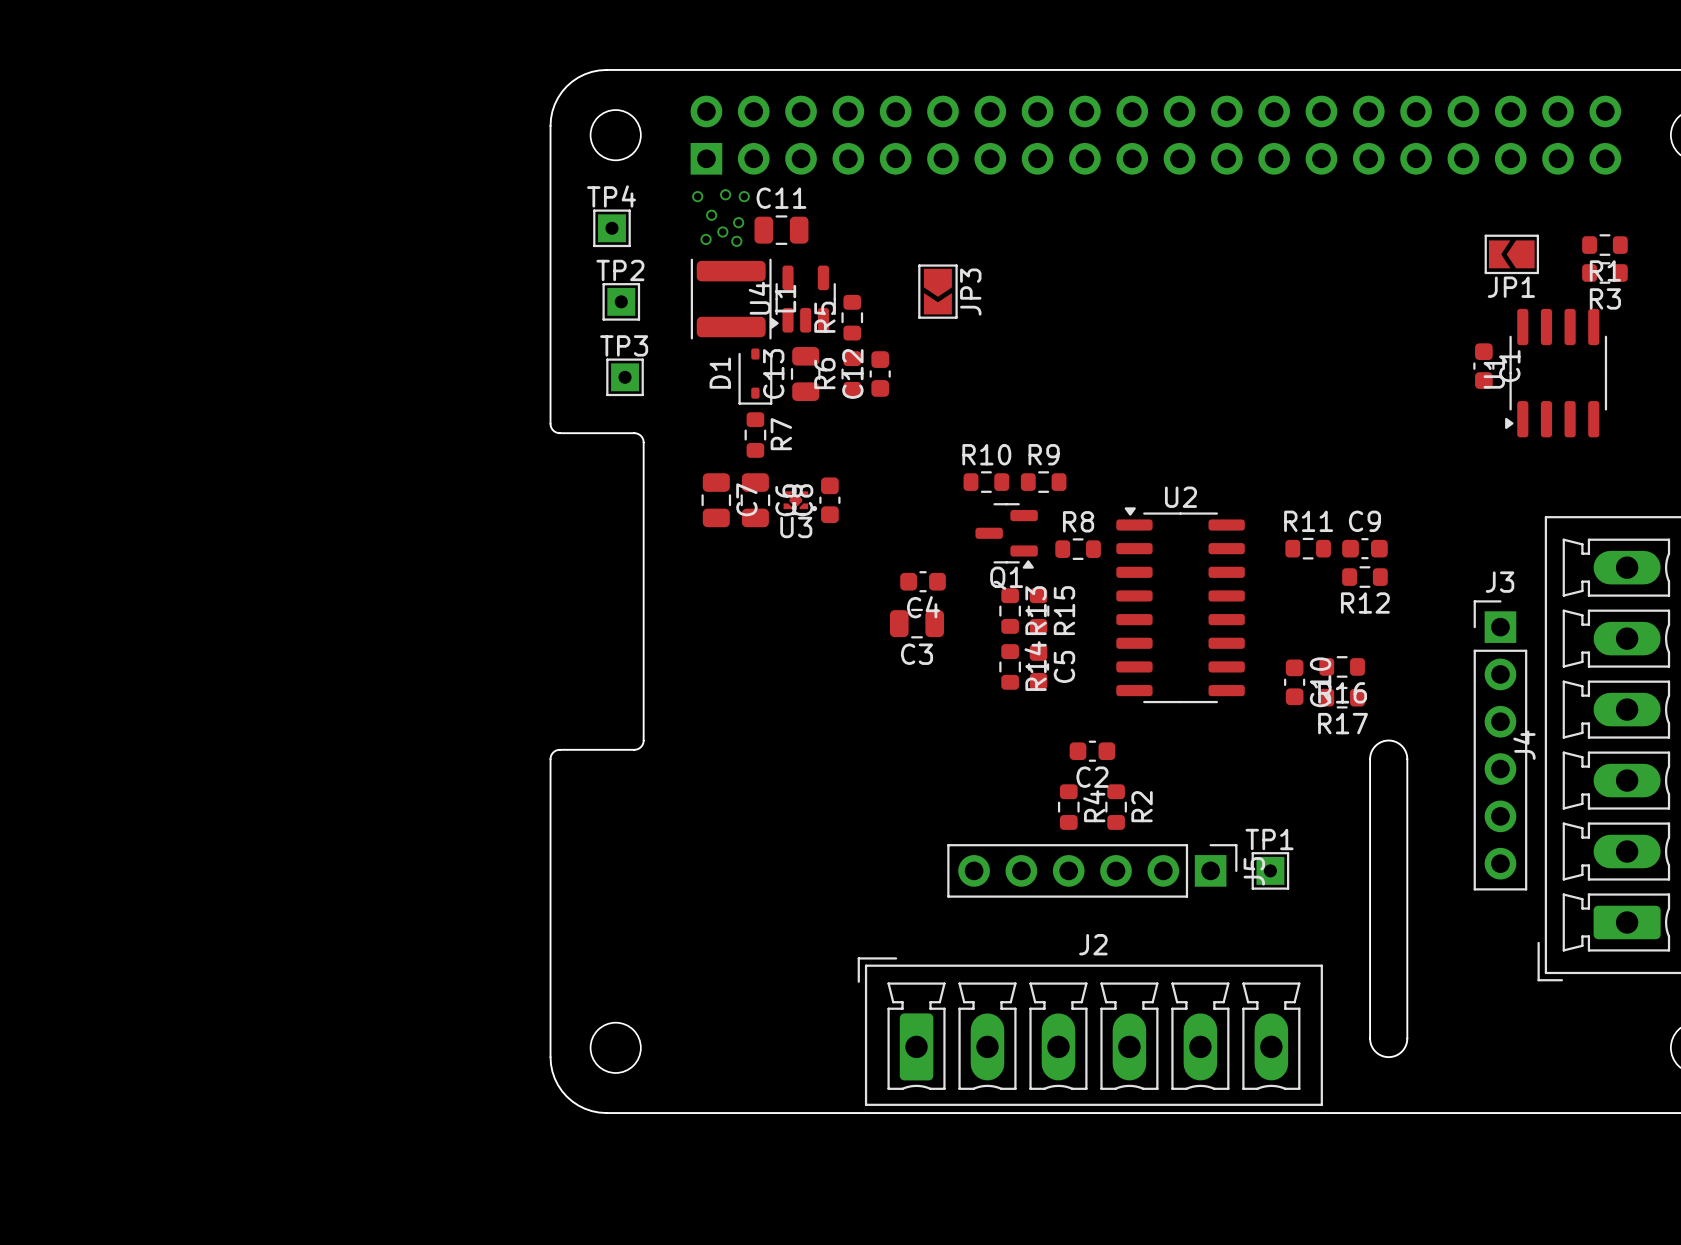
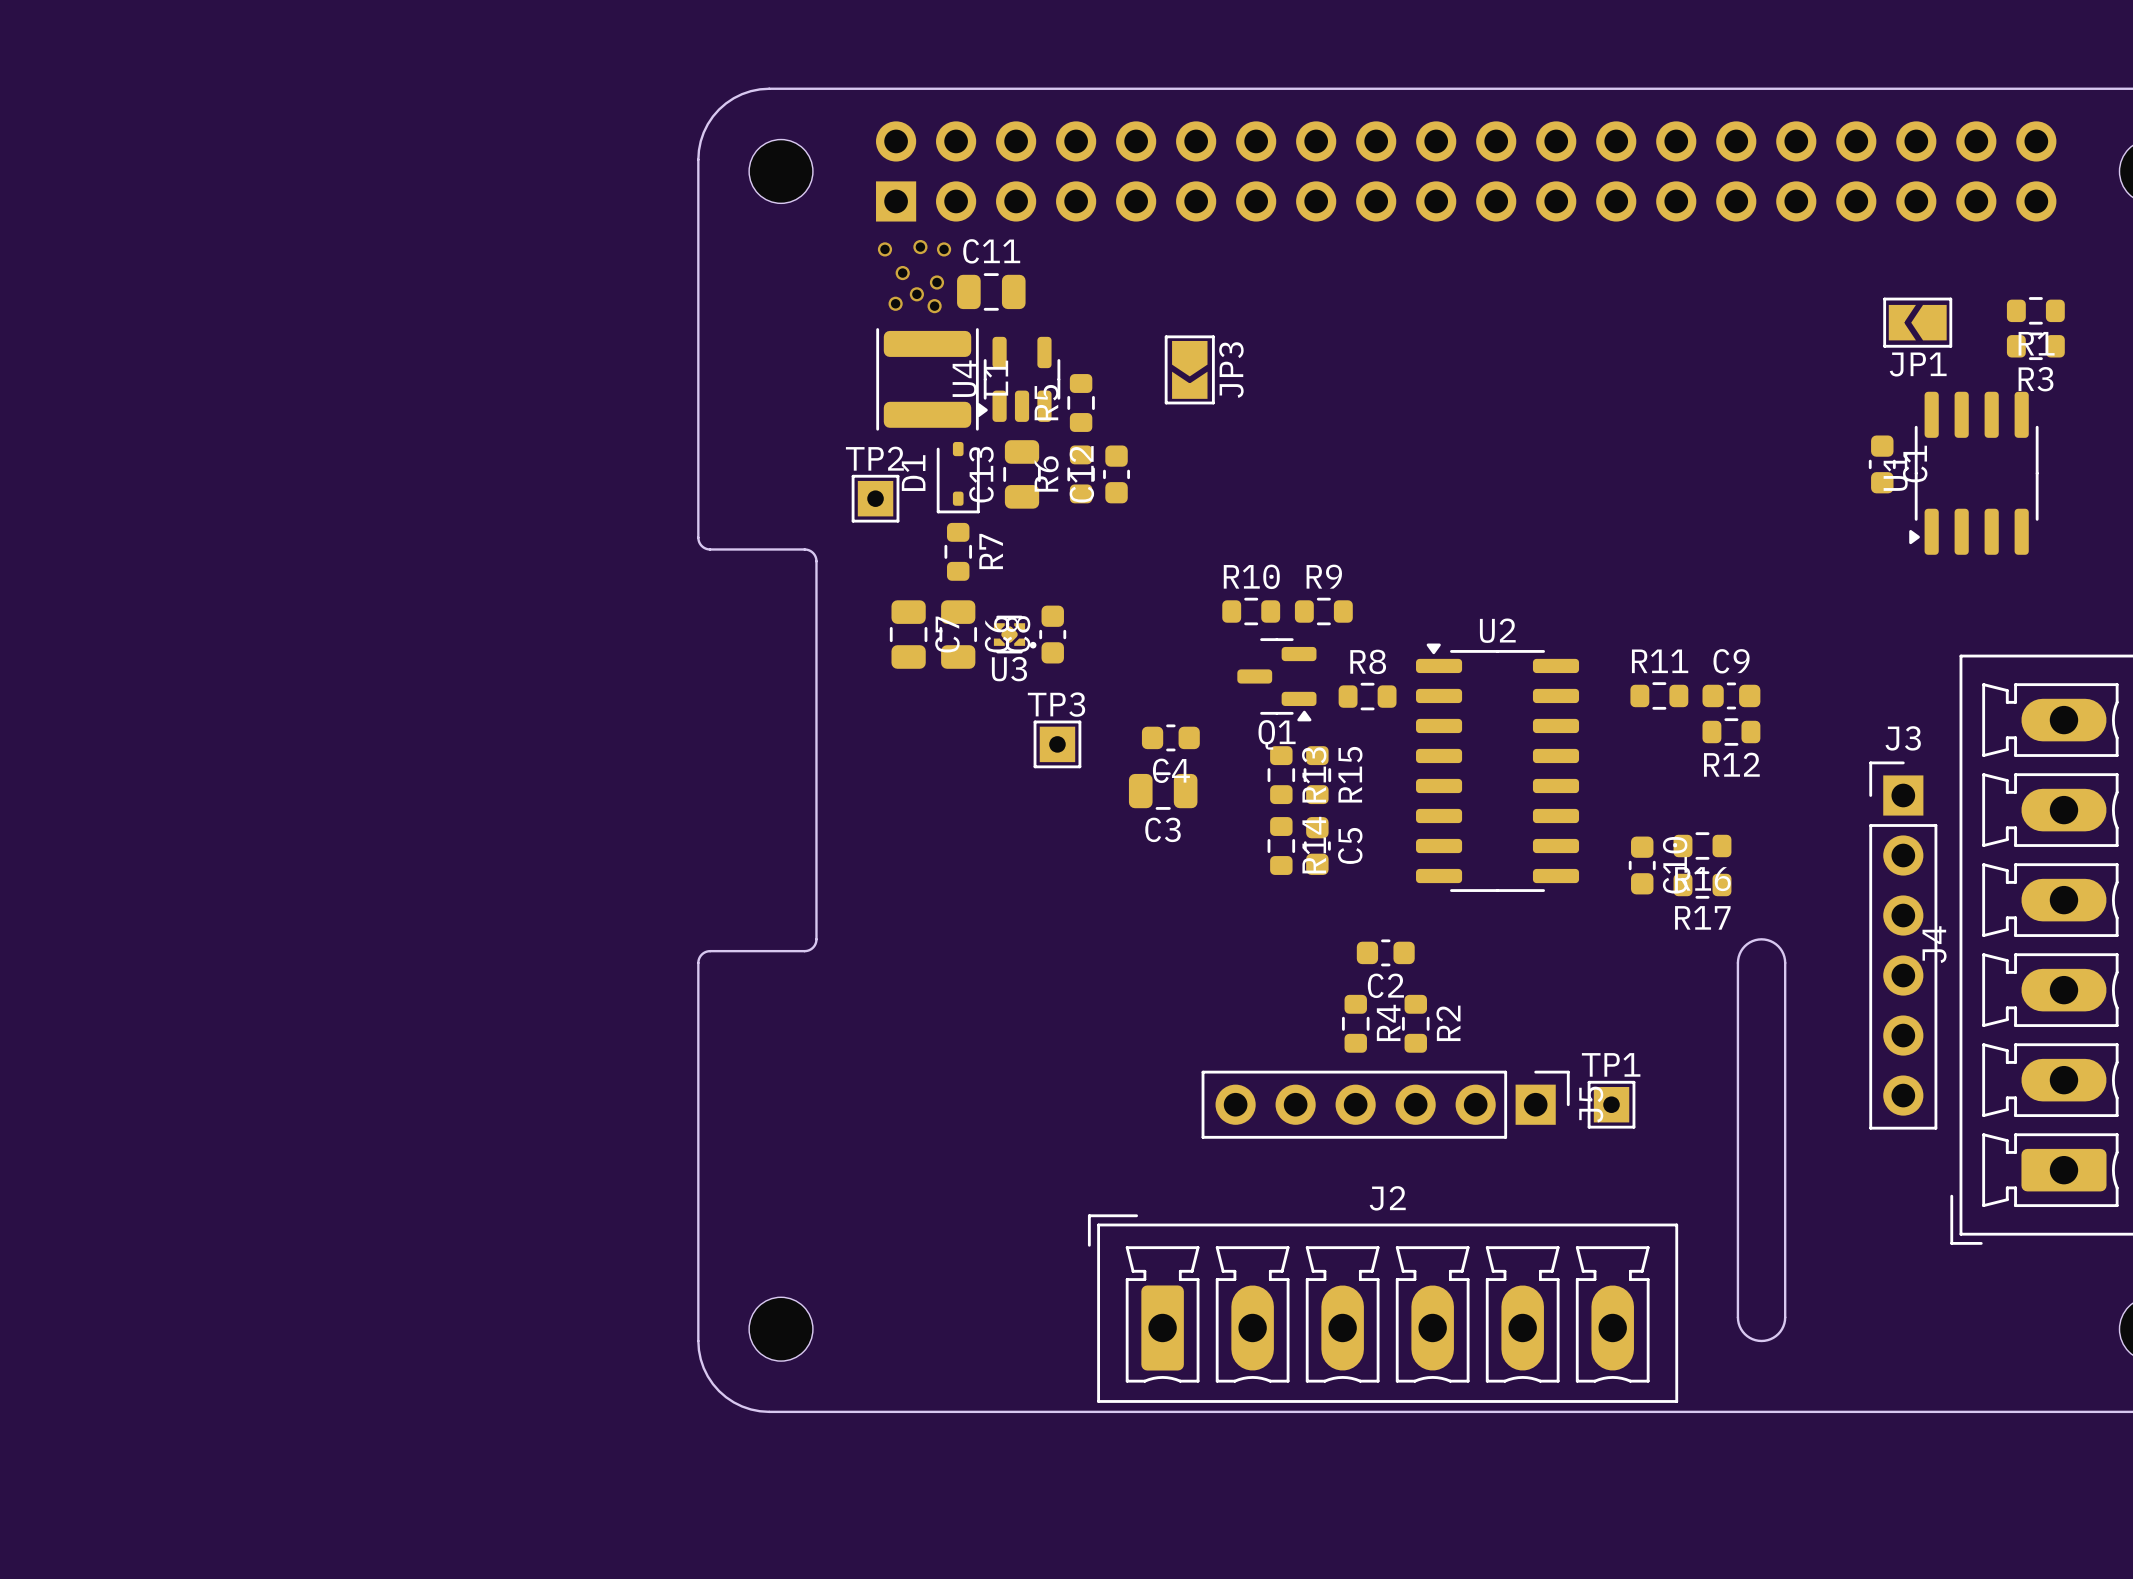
TP4: (611, 228) -> none
TP2 position: (621, 301) -> (875, 498)
TP3 position: (625, 377) -> (1057, 744)

